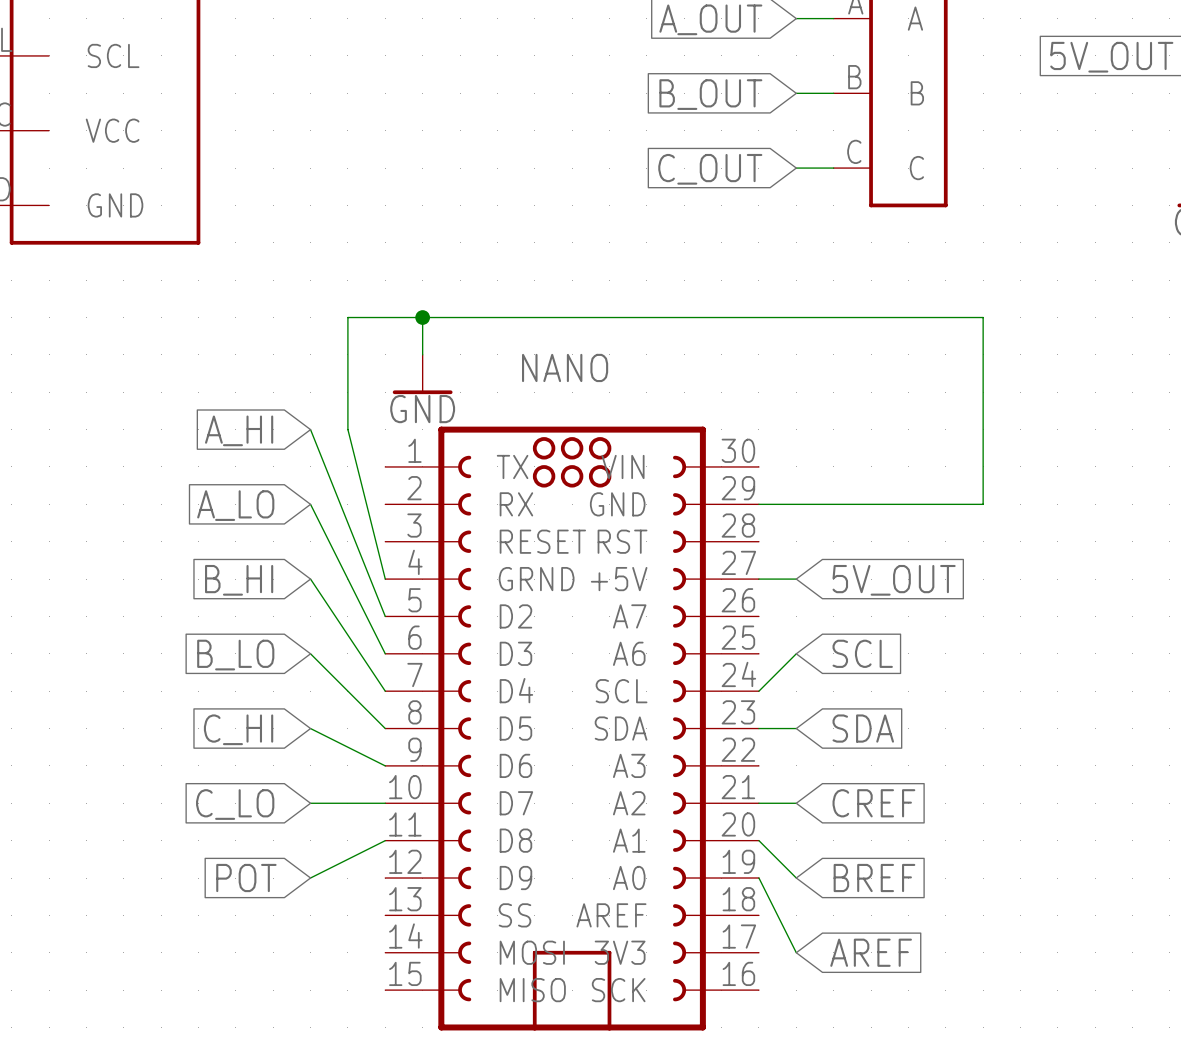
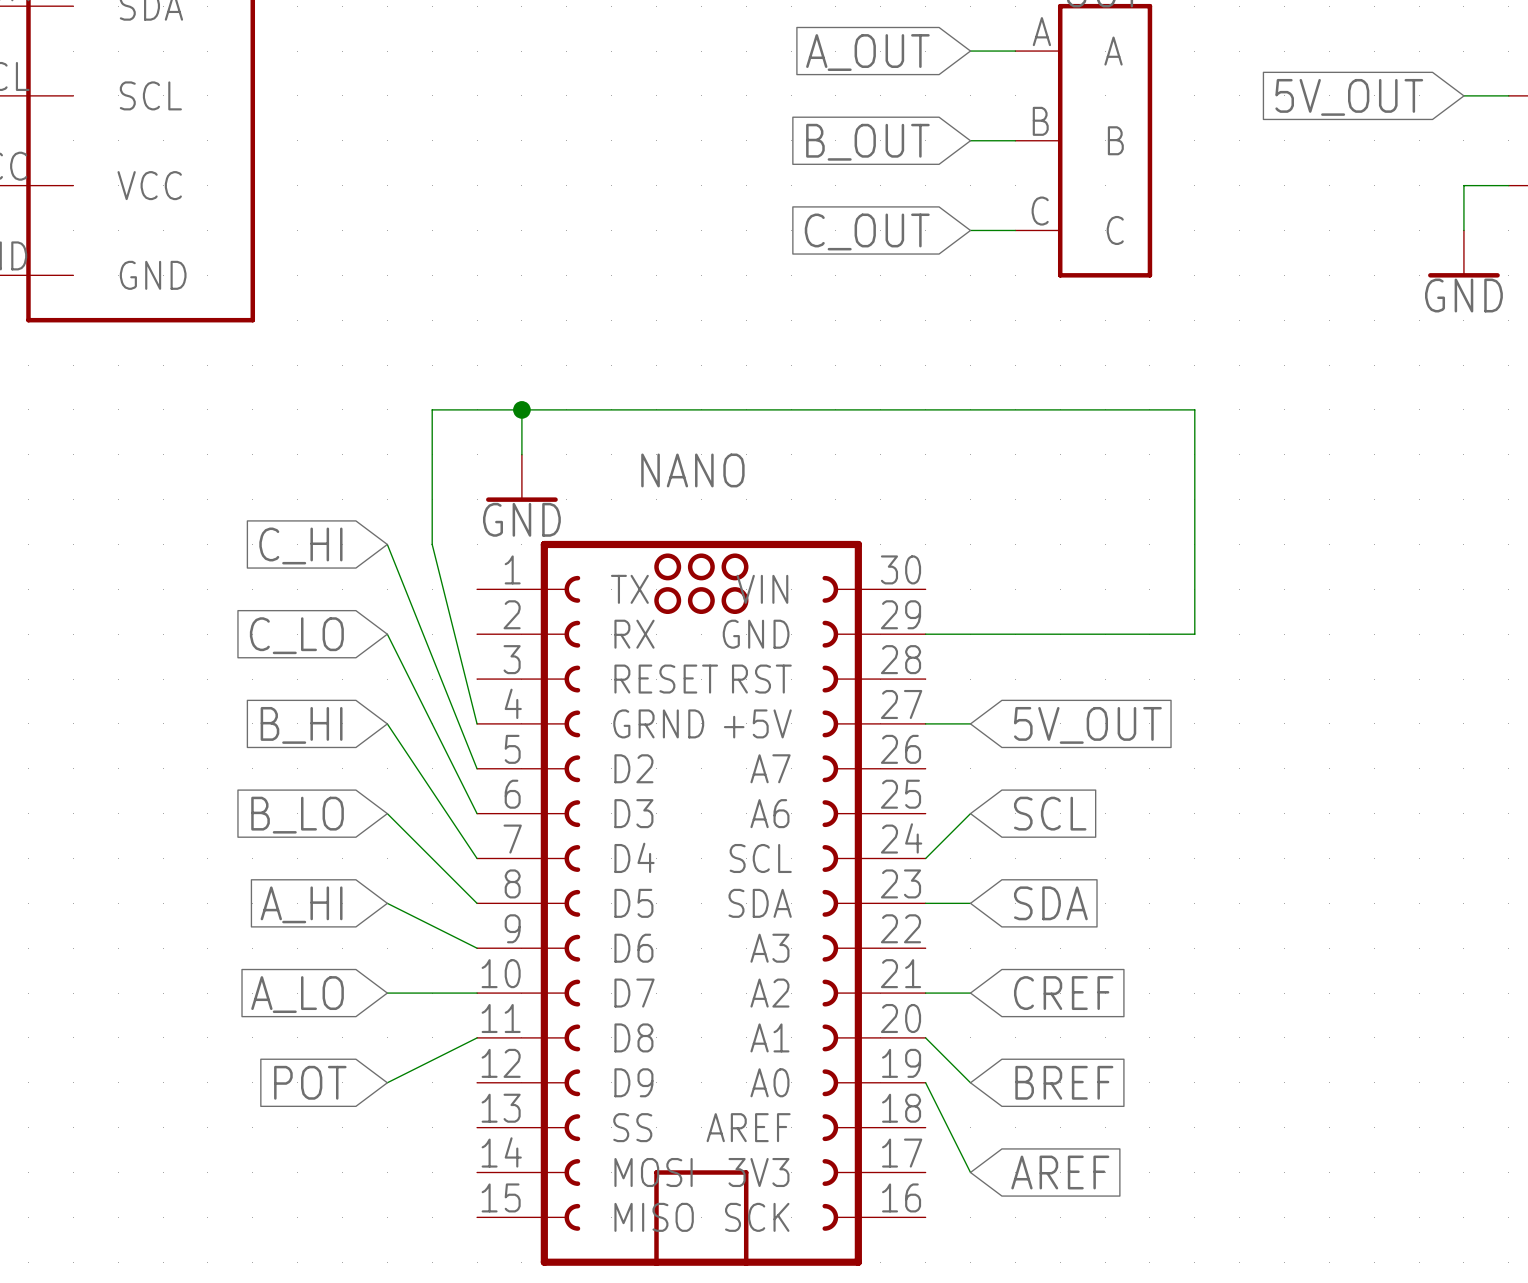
global label: A_HI (239, 430) -> C_HI (300, 545)
global label: A_LO (235, 505) -> C_LO (296, 635)
global label: C_HI (238, 729) -> A_HI (301, 904)
global label: C_LO (235, 804) -> A_LO (297, 994)

